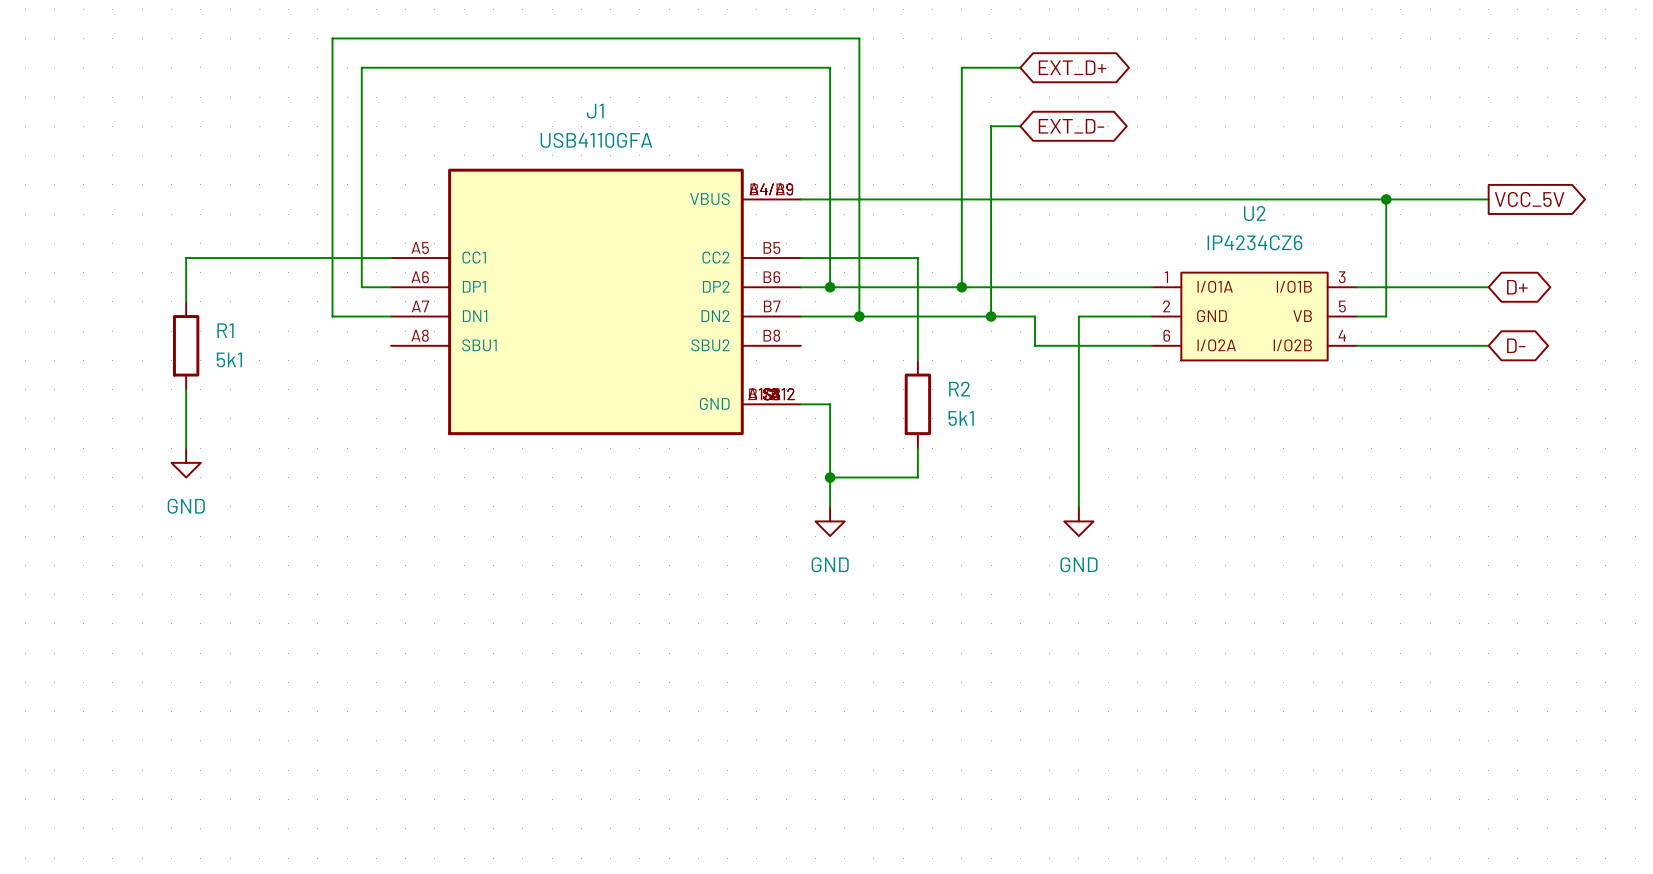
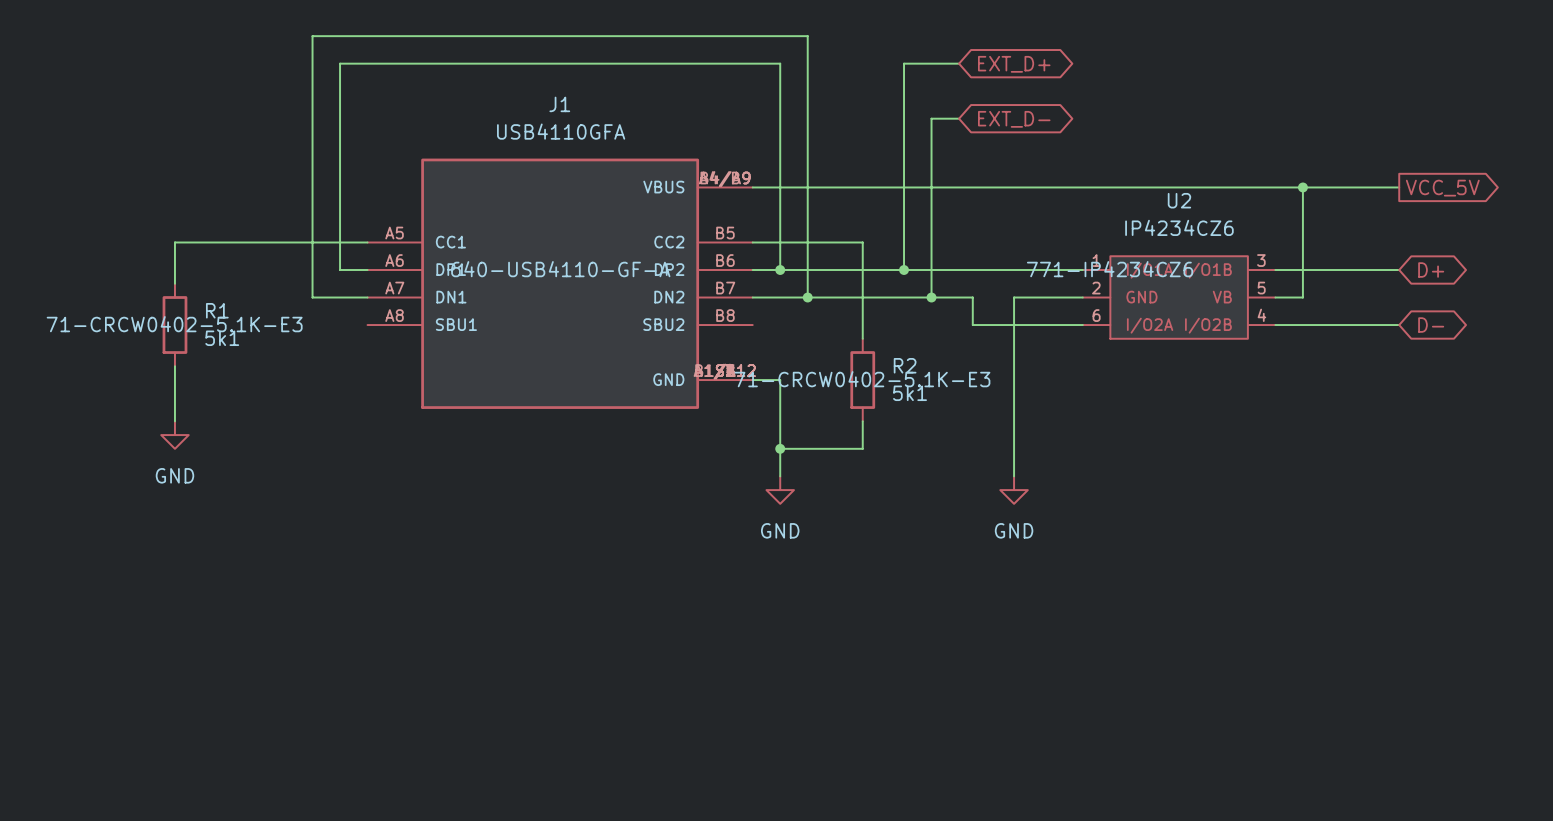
J1 text: none -> 640-USB4110-GF-A (560, 269)
U2 text: none -> 771-IP4234CZ6 (1110, 269)
R1 text: none -> 71-CRCW0402-5.1K-E3 (174, 324)
R2 text: none -> 71-CRCW0402-5.1K-E3 (862, 379)

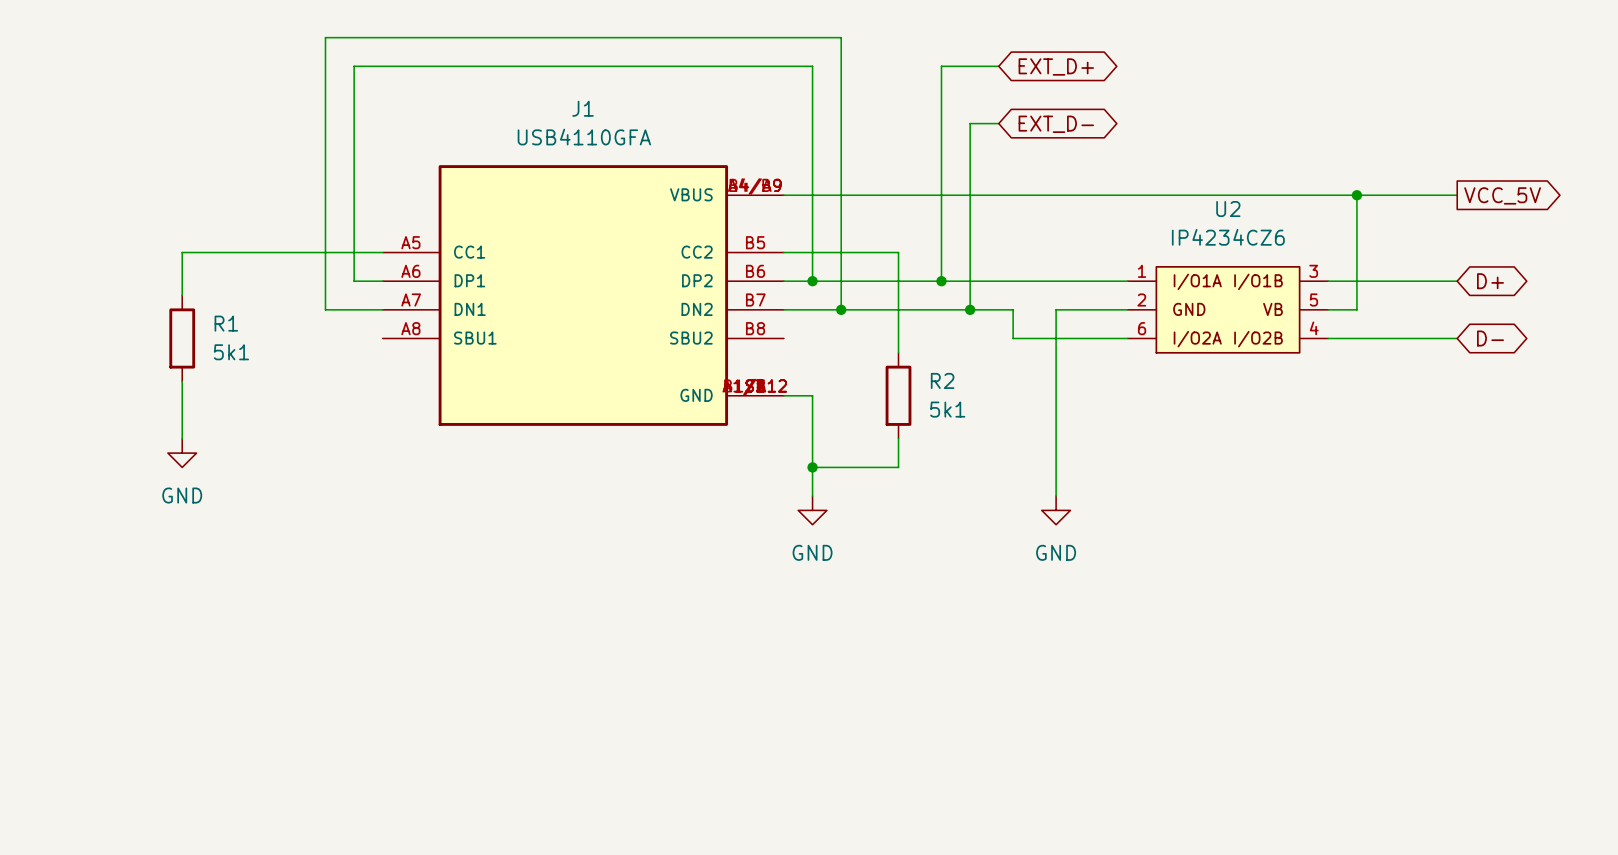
J1 text: 640-USB4110-GF-A (560, 269) -> none
U2 text: 771-IP4234CZ6 (1110, 269) -> none
R1 text: 71-CRCW0402-5.1K-E3 (174, 324) -> none
R2 text: 71-CRCW0402-5.1K-E3 (862, 379) -> none

